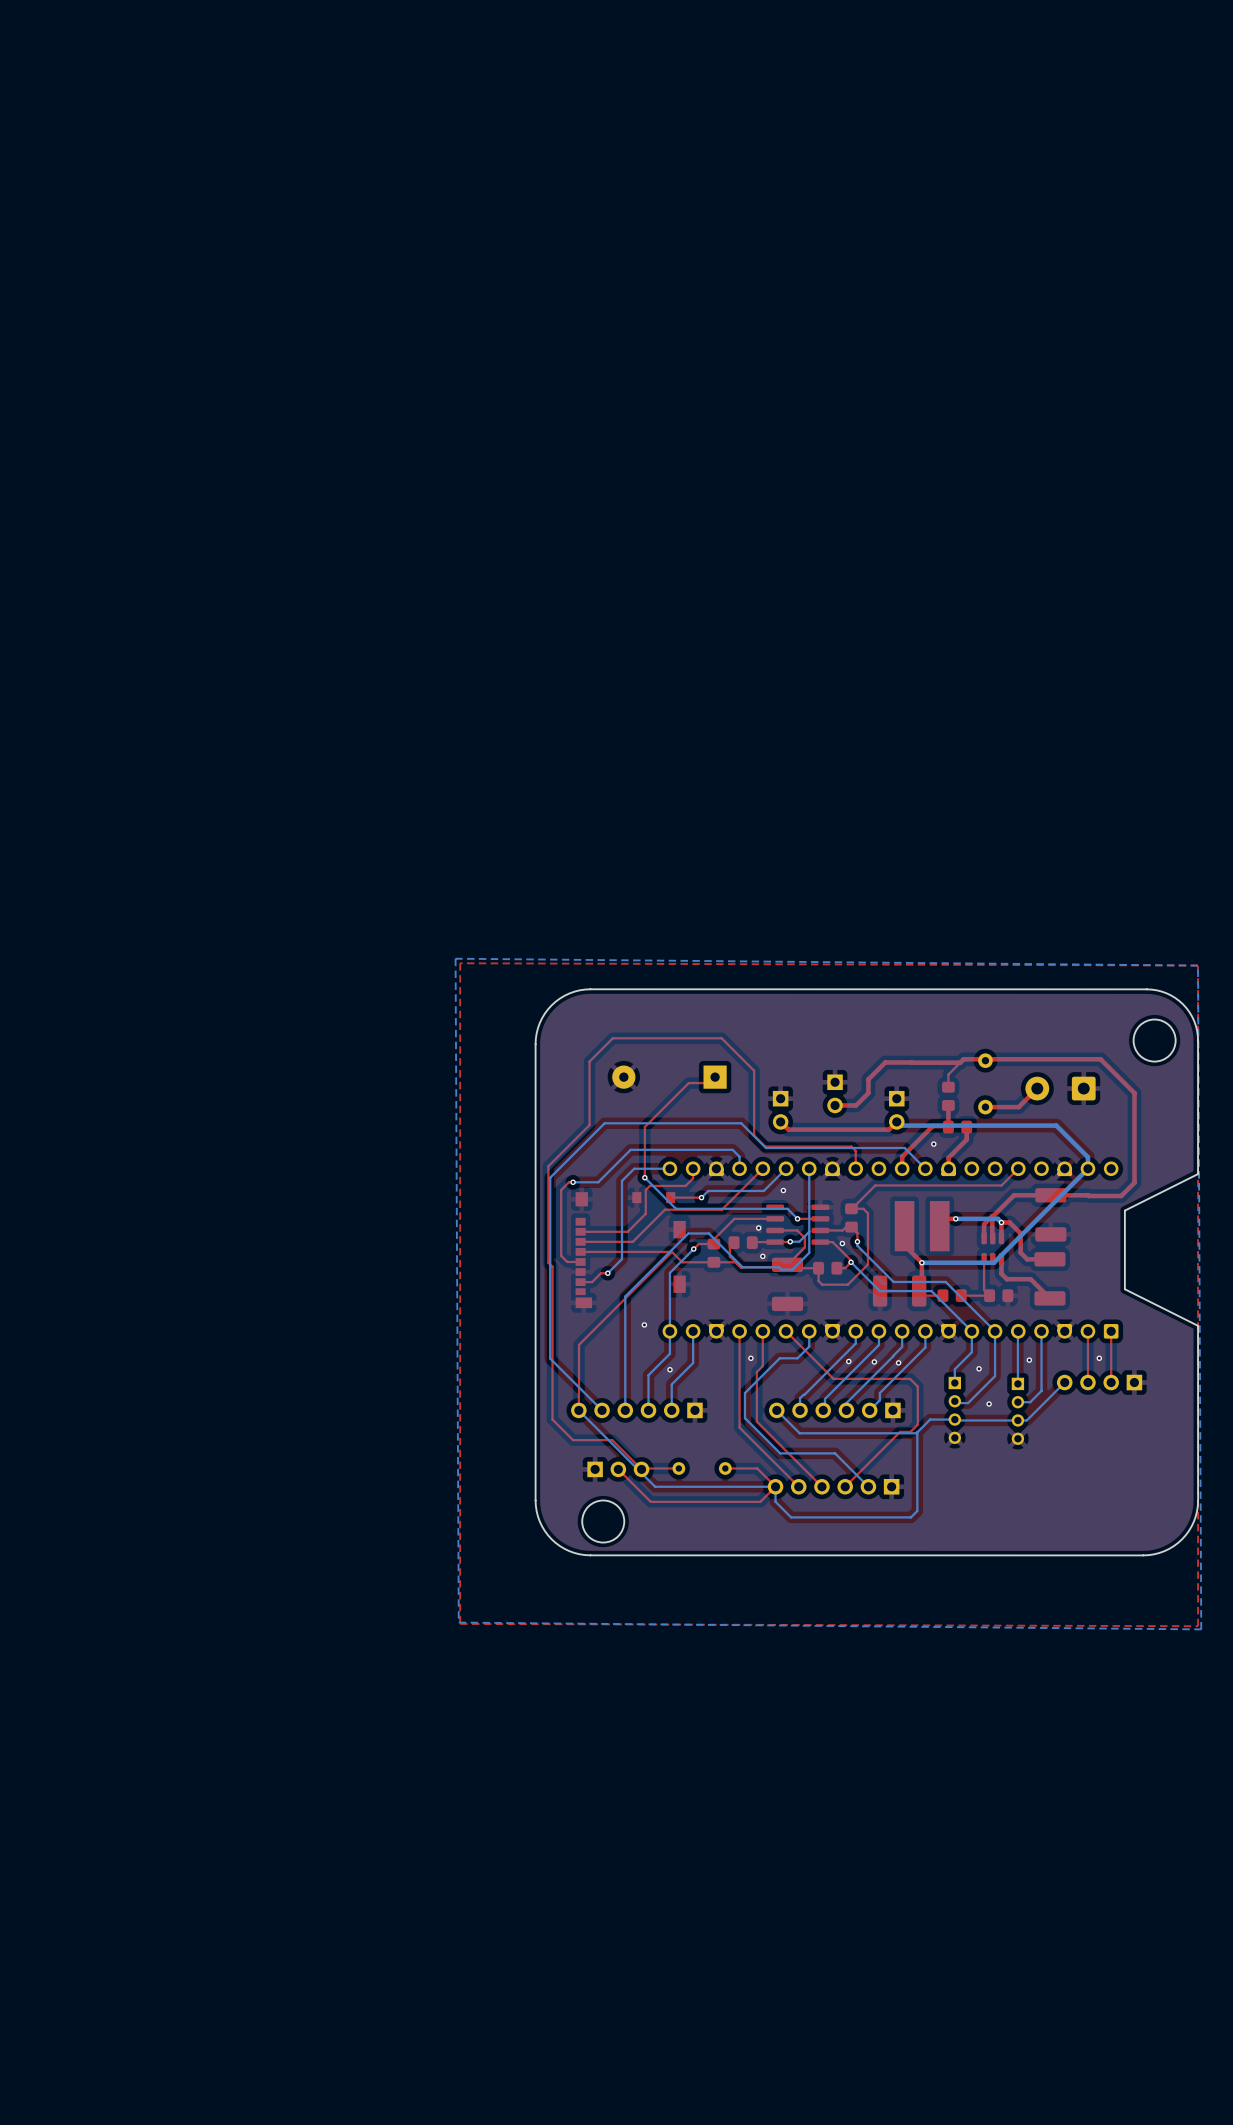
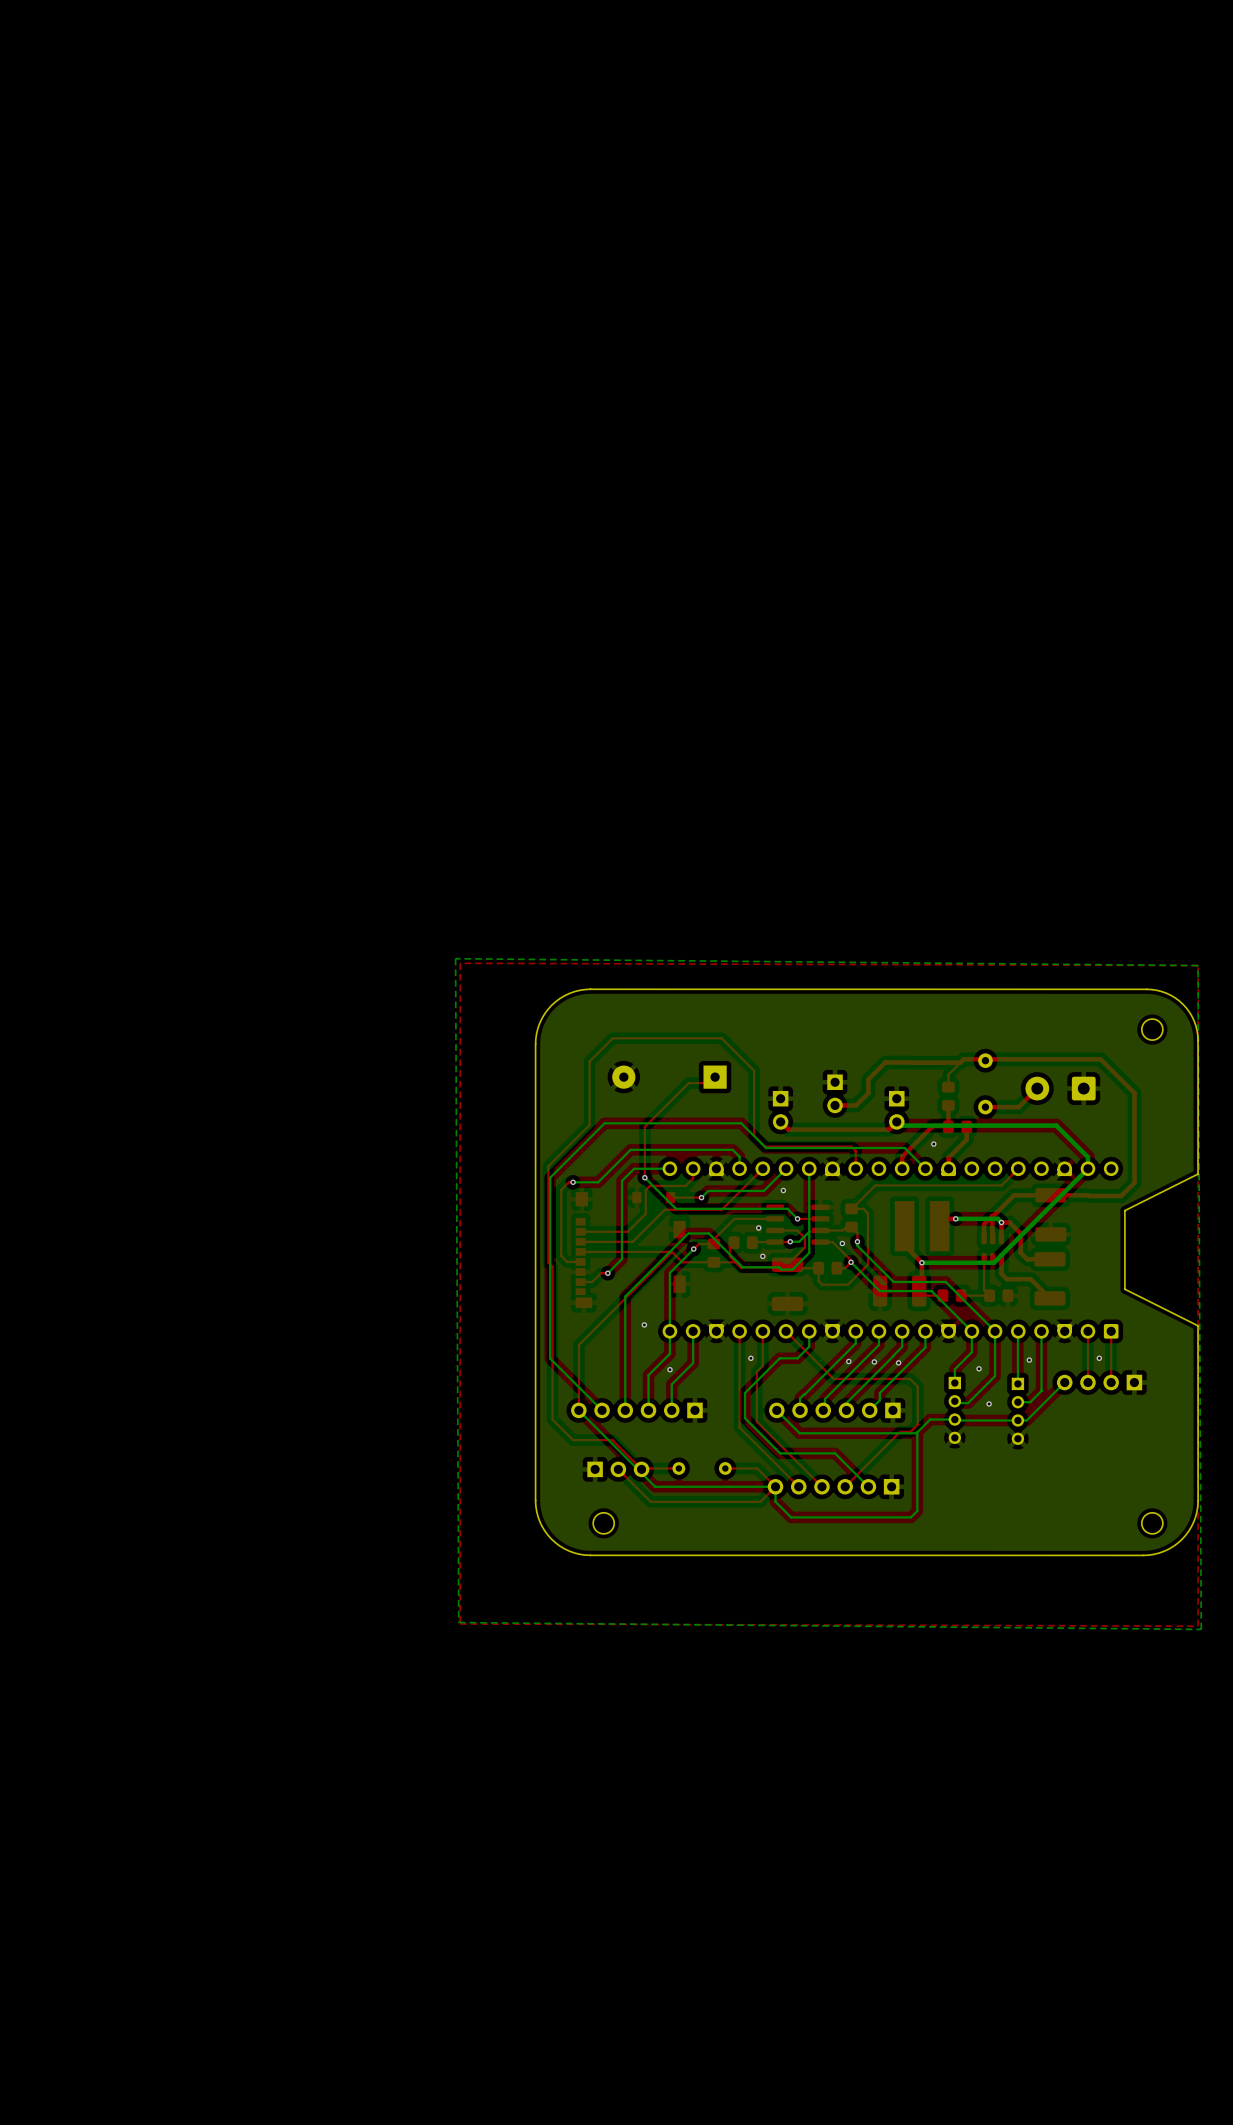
round board edge: none -> [1141, 1018, 1164, 1041]
round board edge: [1133, 1019, 1176, 1062] -> none
round board edge size: [581, 1500, 625, 1543] -> [592, 1512, 615, 1535]
round board edge: none -> [1141, 1512, 1164, 1535]

